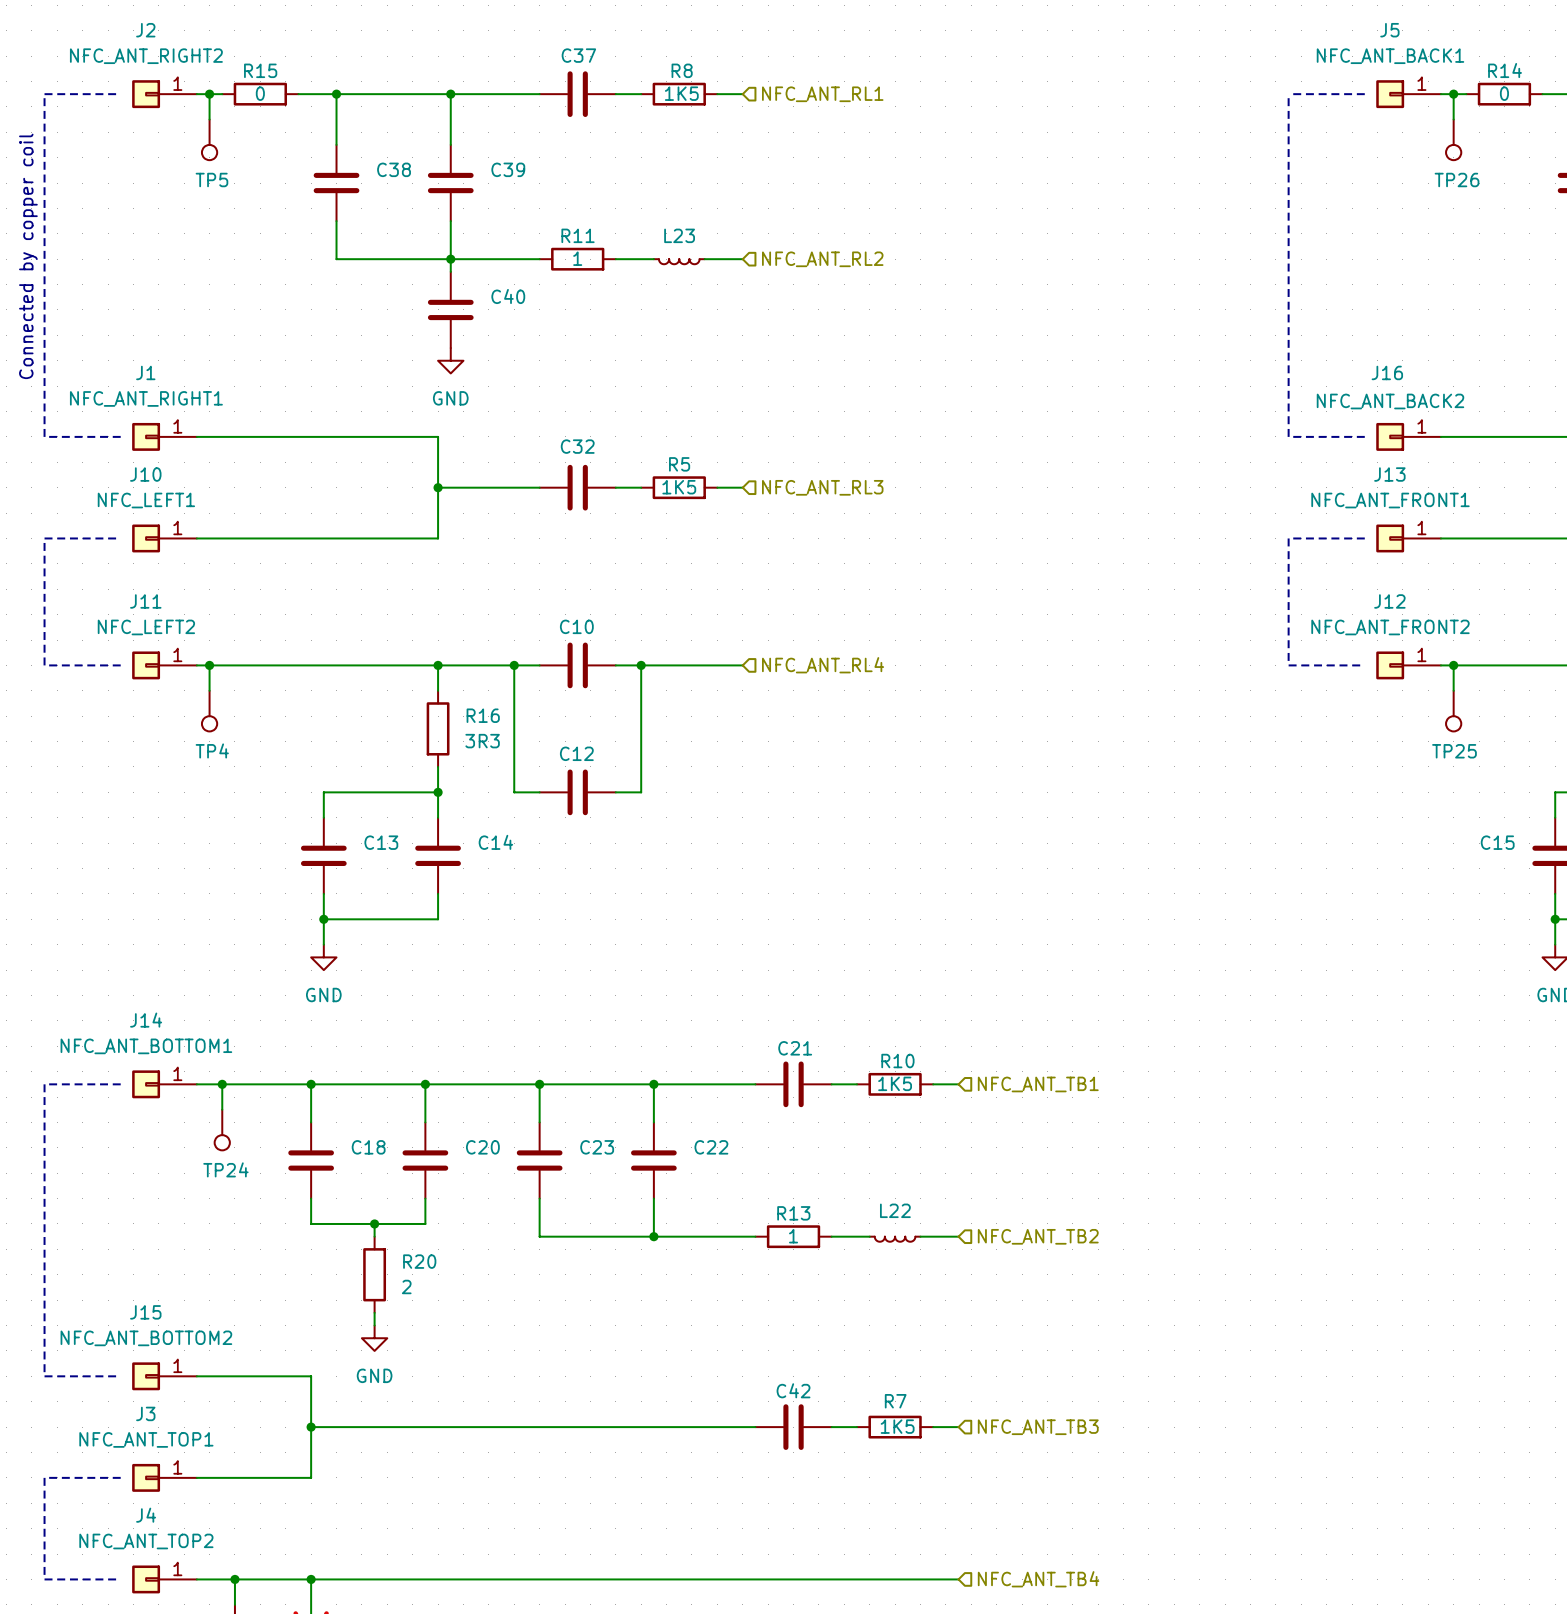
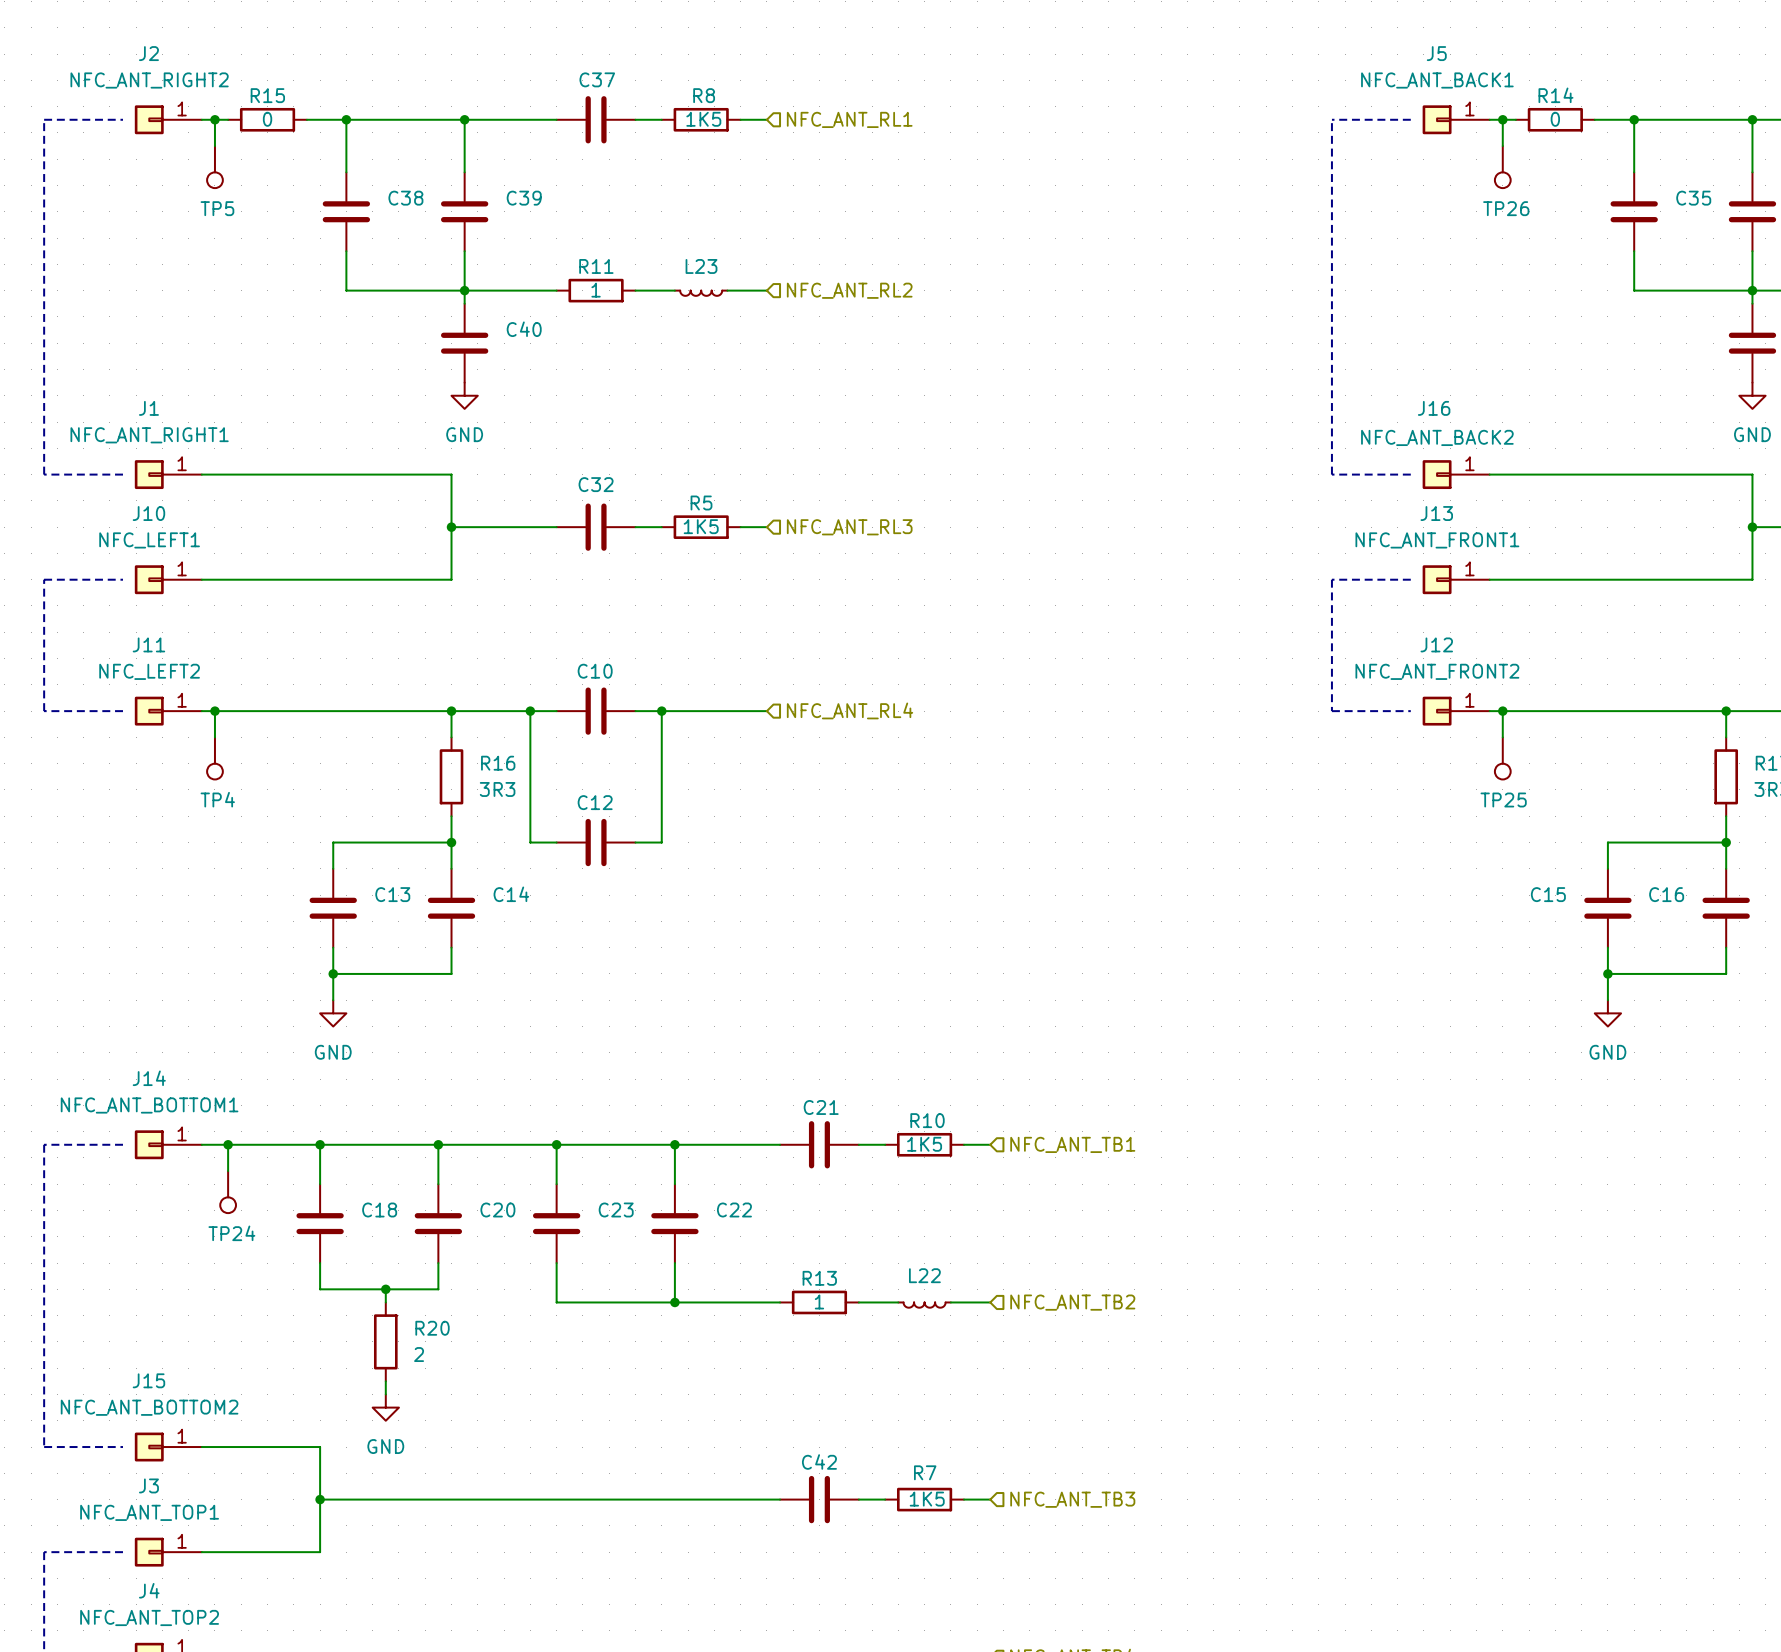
text: Connected by copper coil (28, 256) -> none

